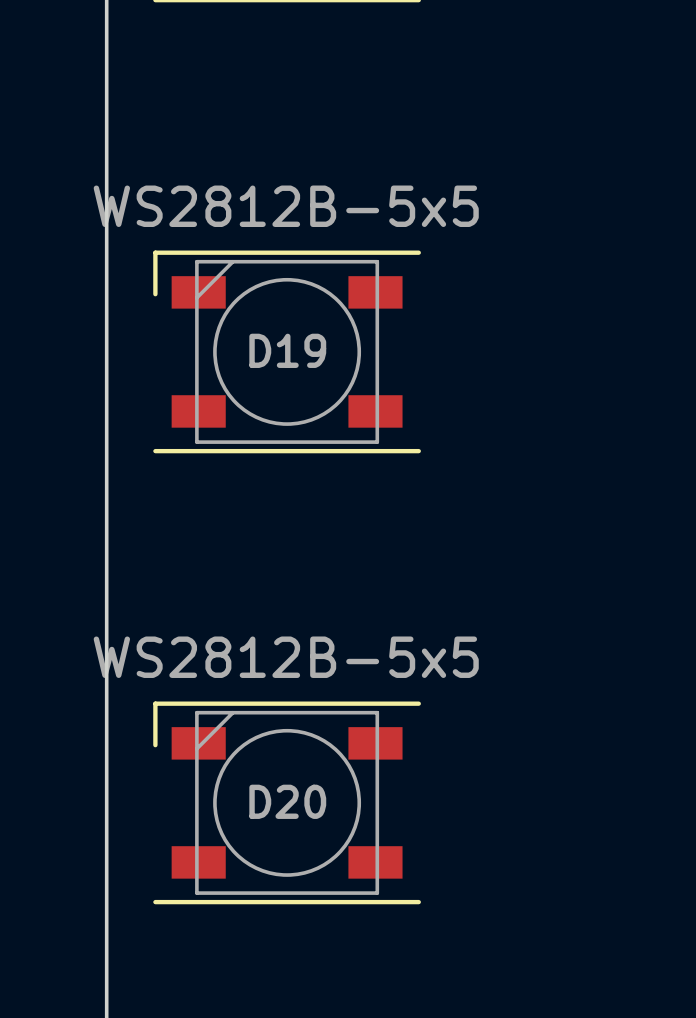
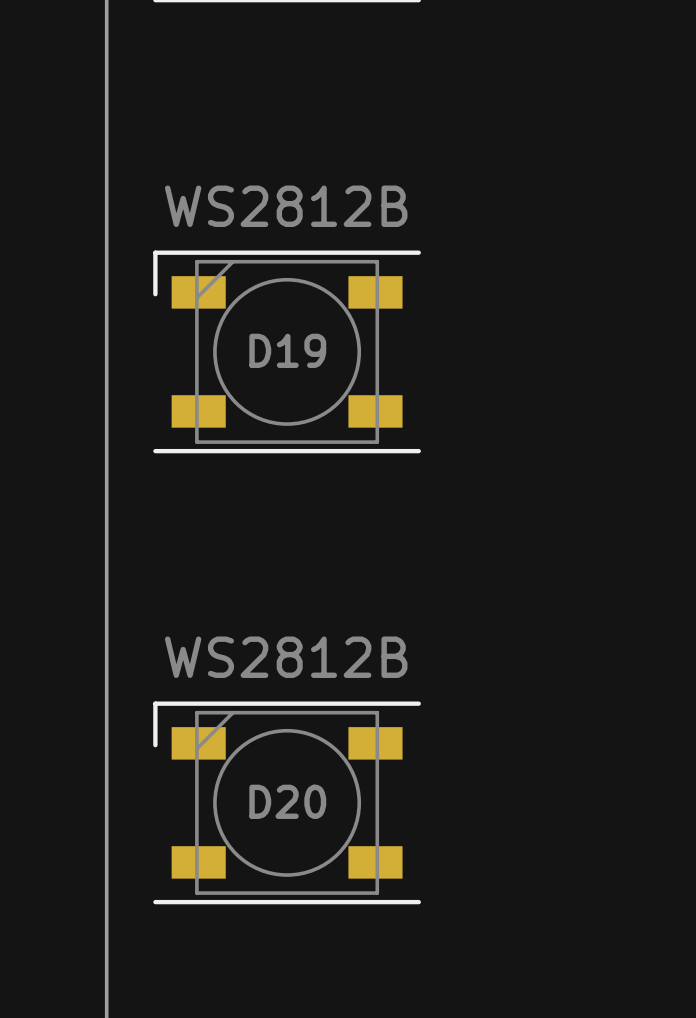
D19 value: WS2812B-5x5 (286, 206) -> WS2812B (286, 206)
D20 value: WS2812B-5x5 (286, 657) -> WS2812B (286, 657)

